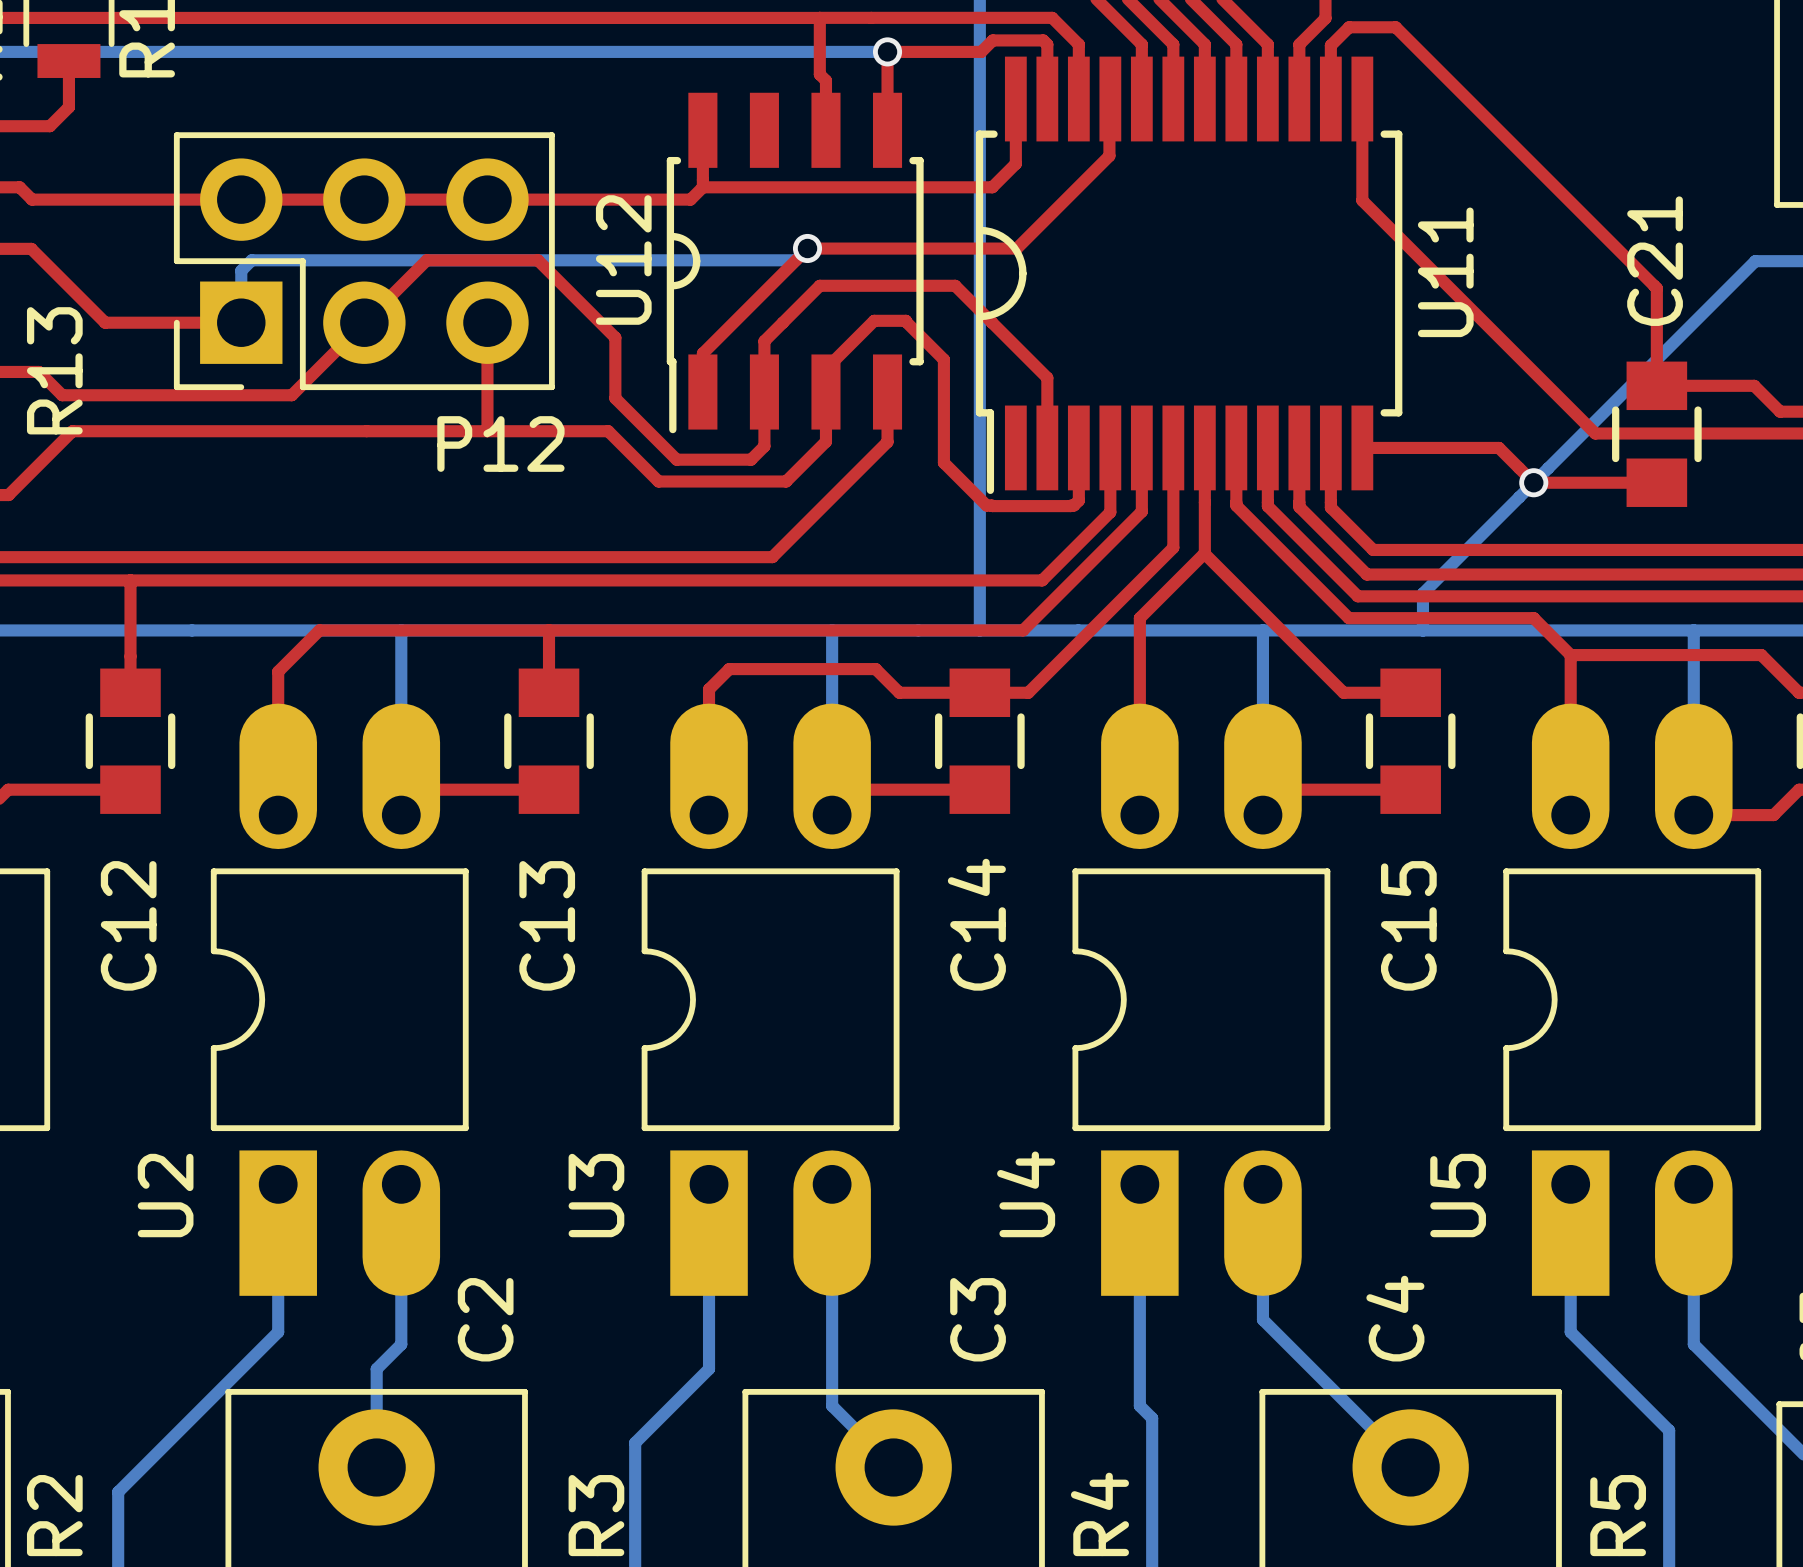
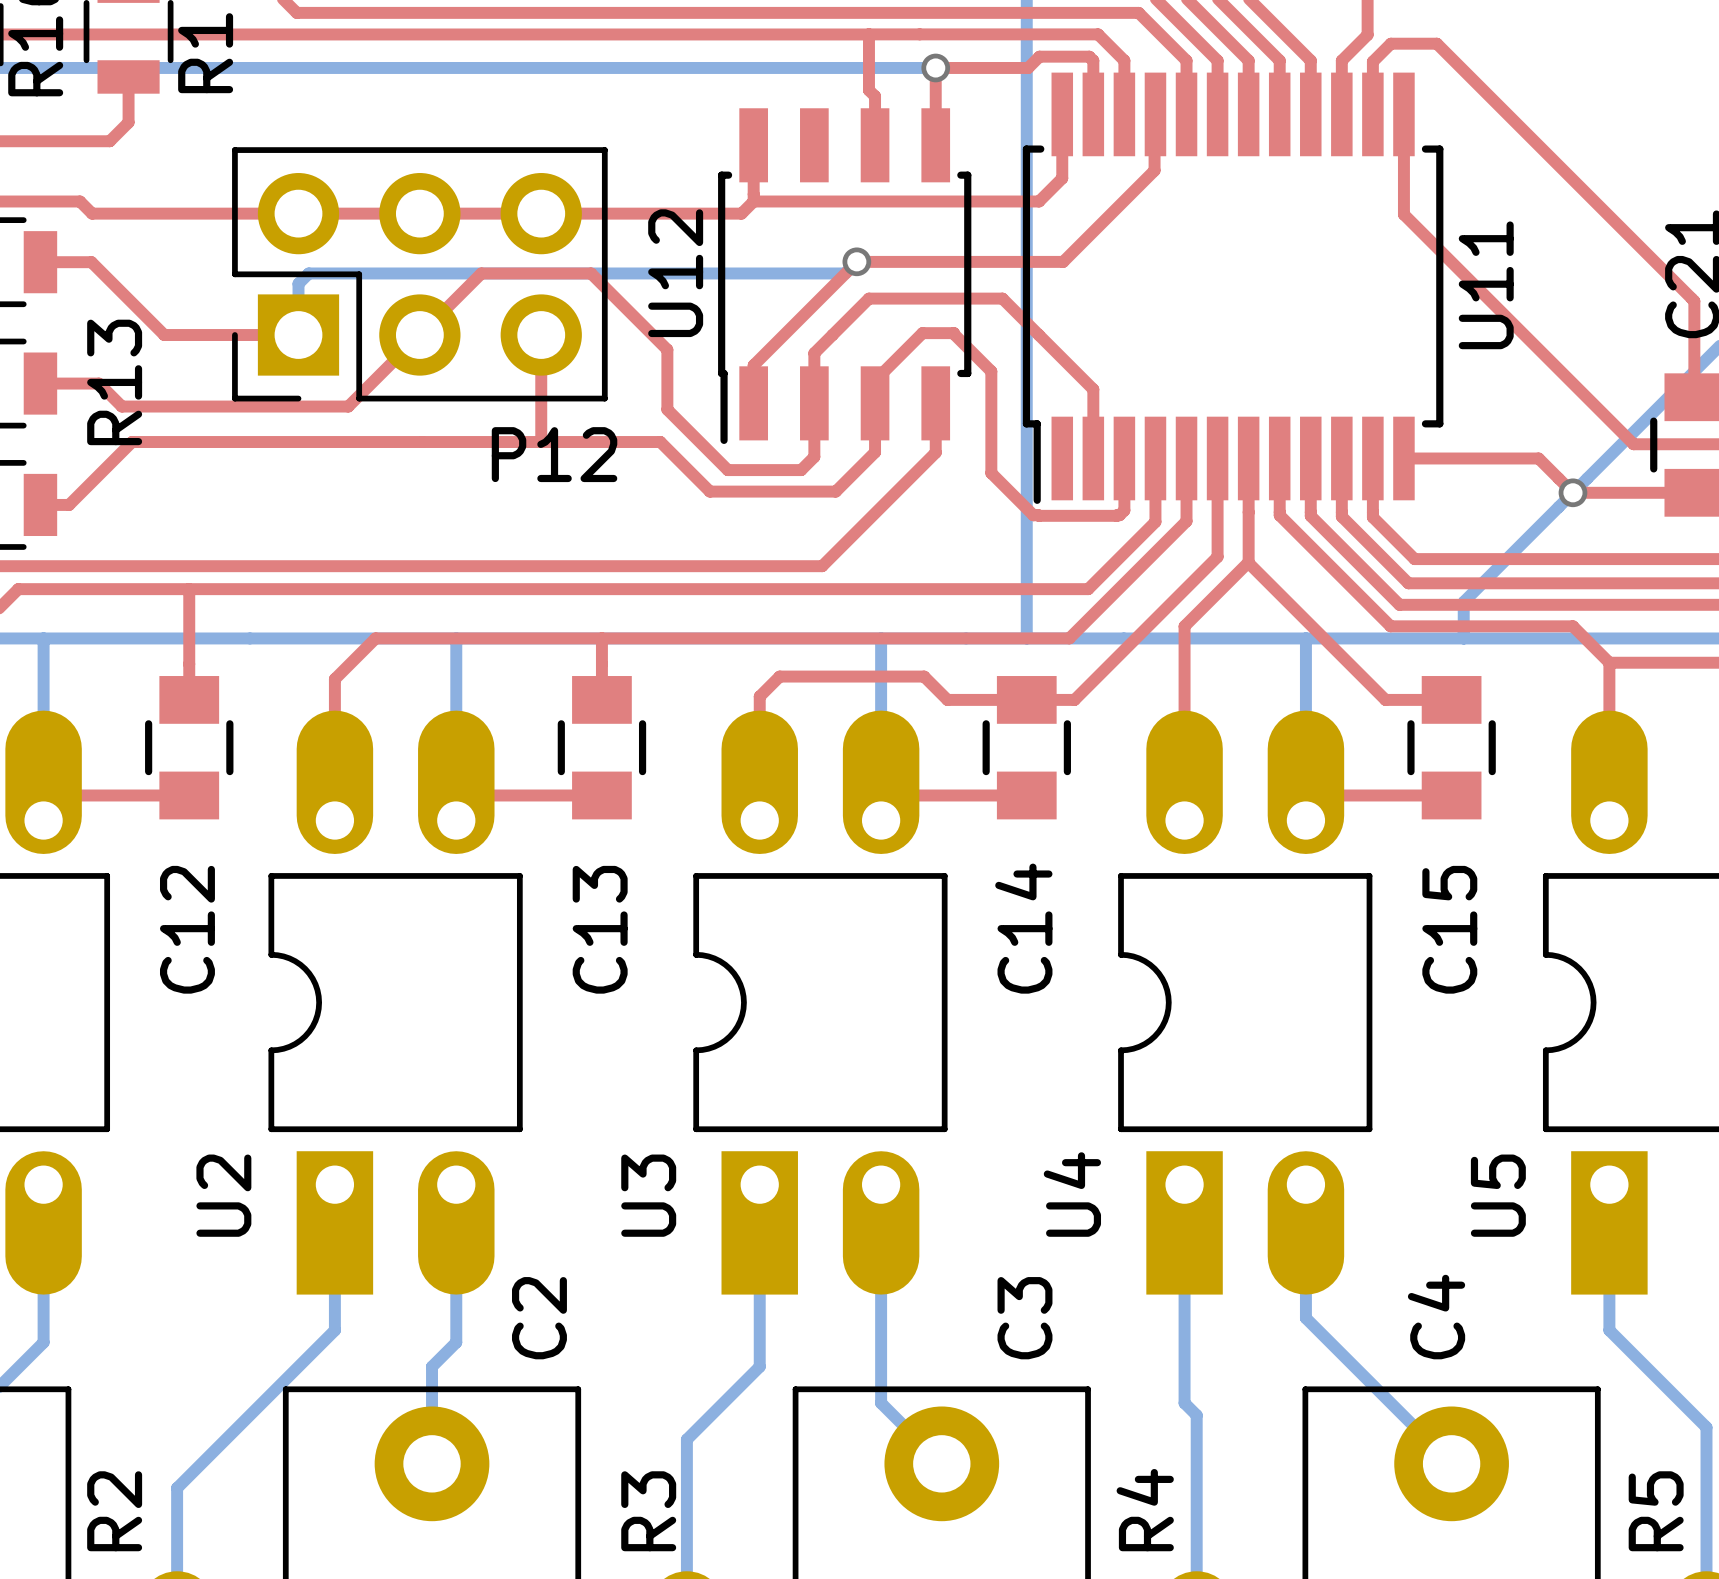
U11 footprint: [975, 56, 1403, 494] -> [1022, 72, 1444, 504]
U12 footprint: [666, 92, 924, 434] -> [718, 108, 972, 444]

